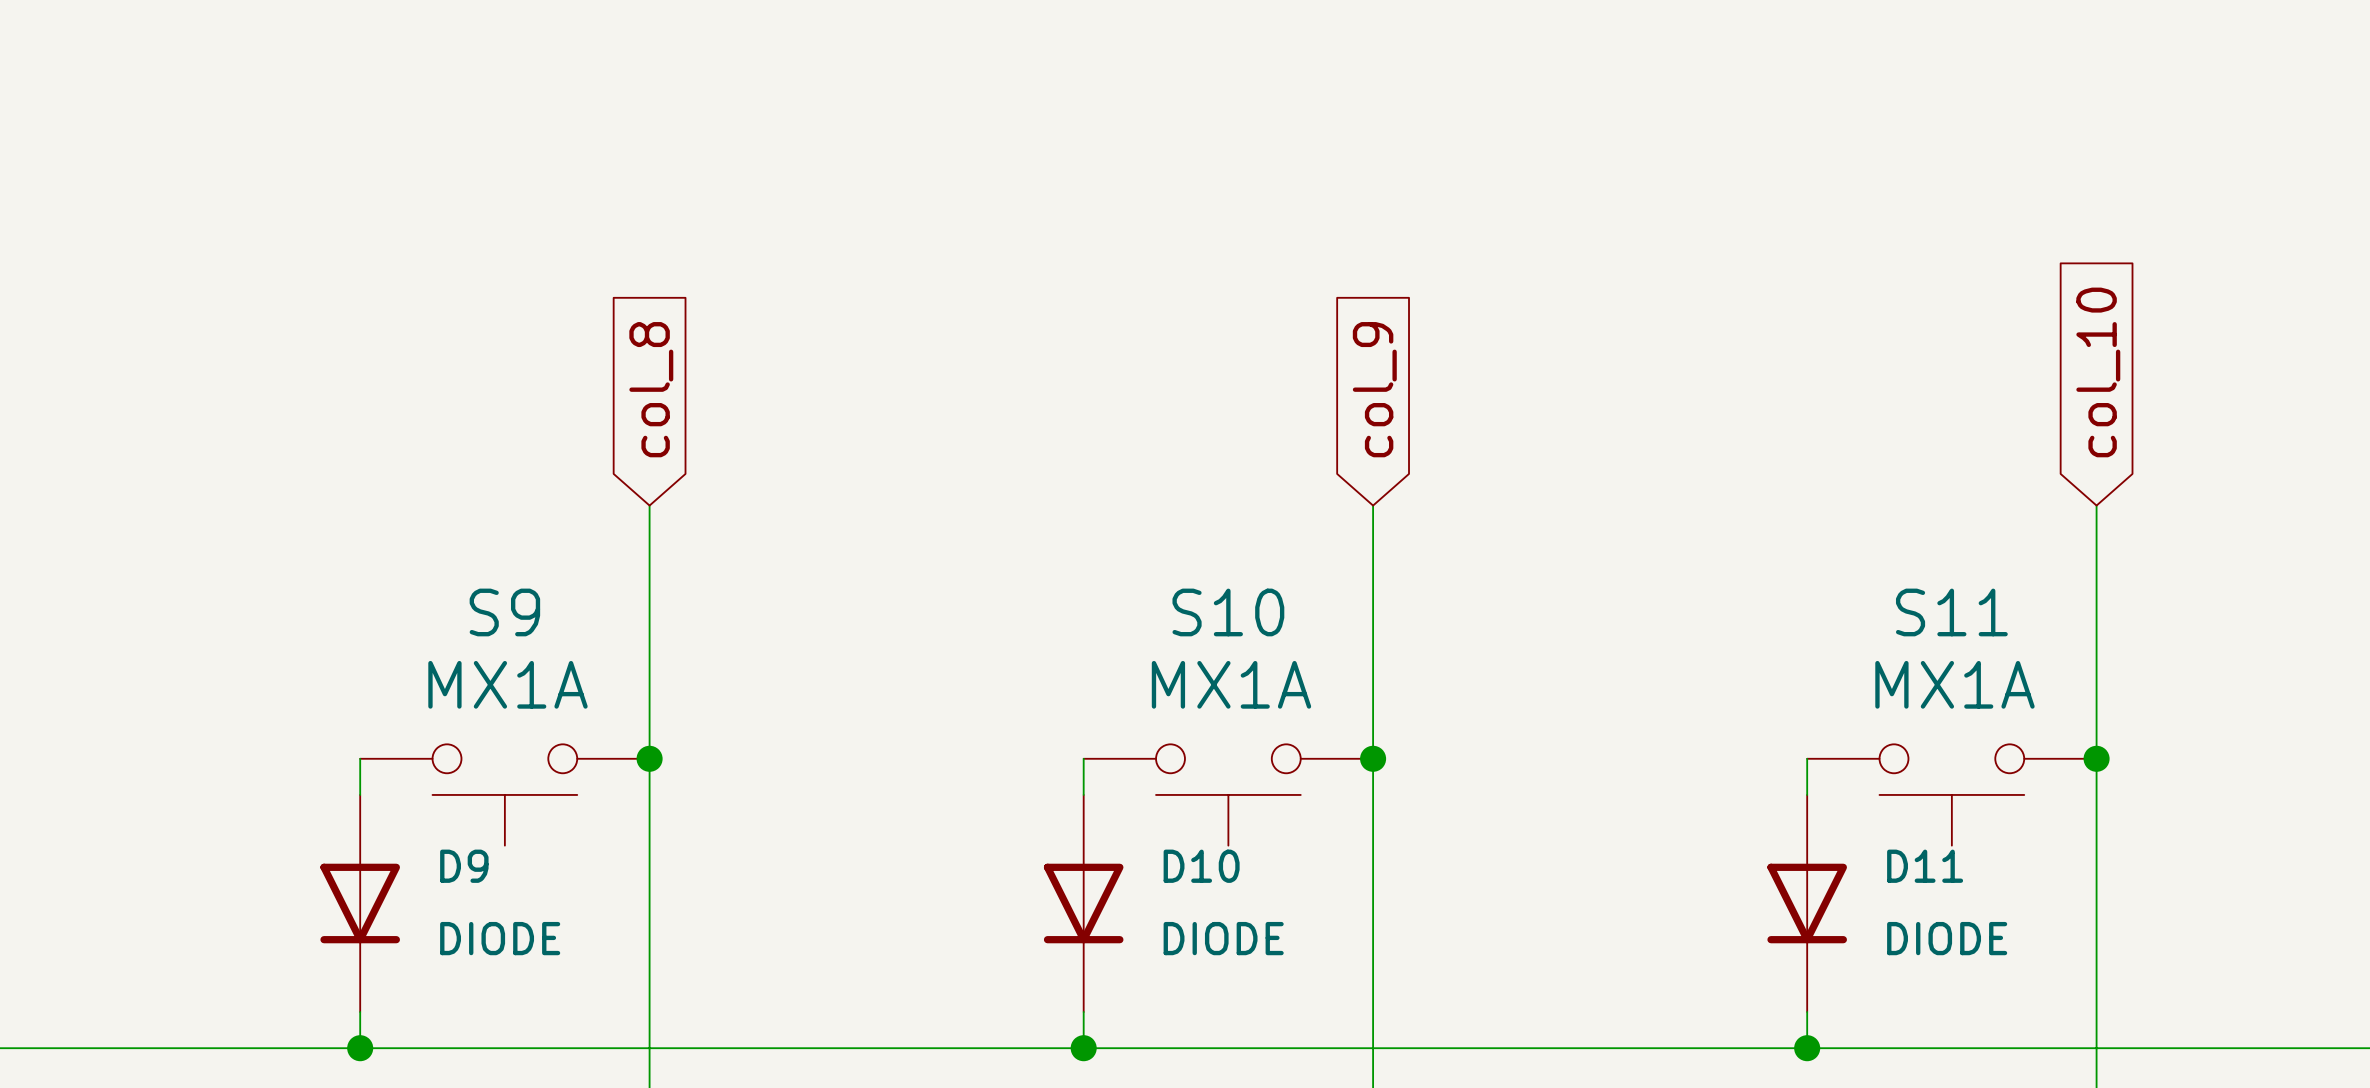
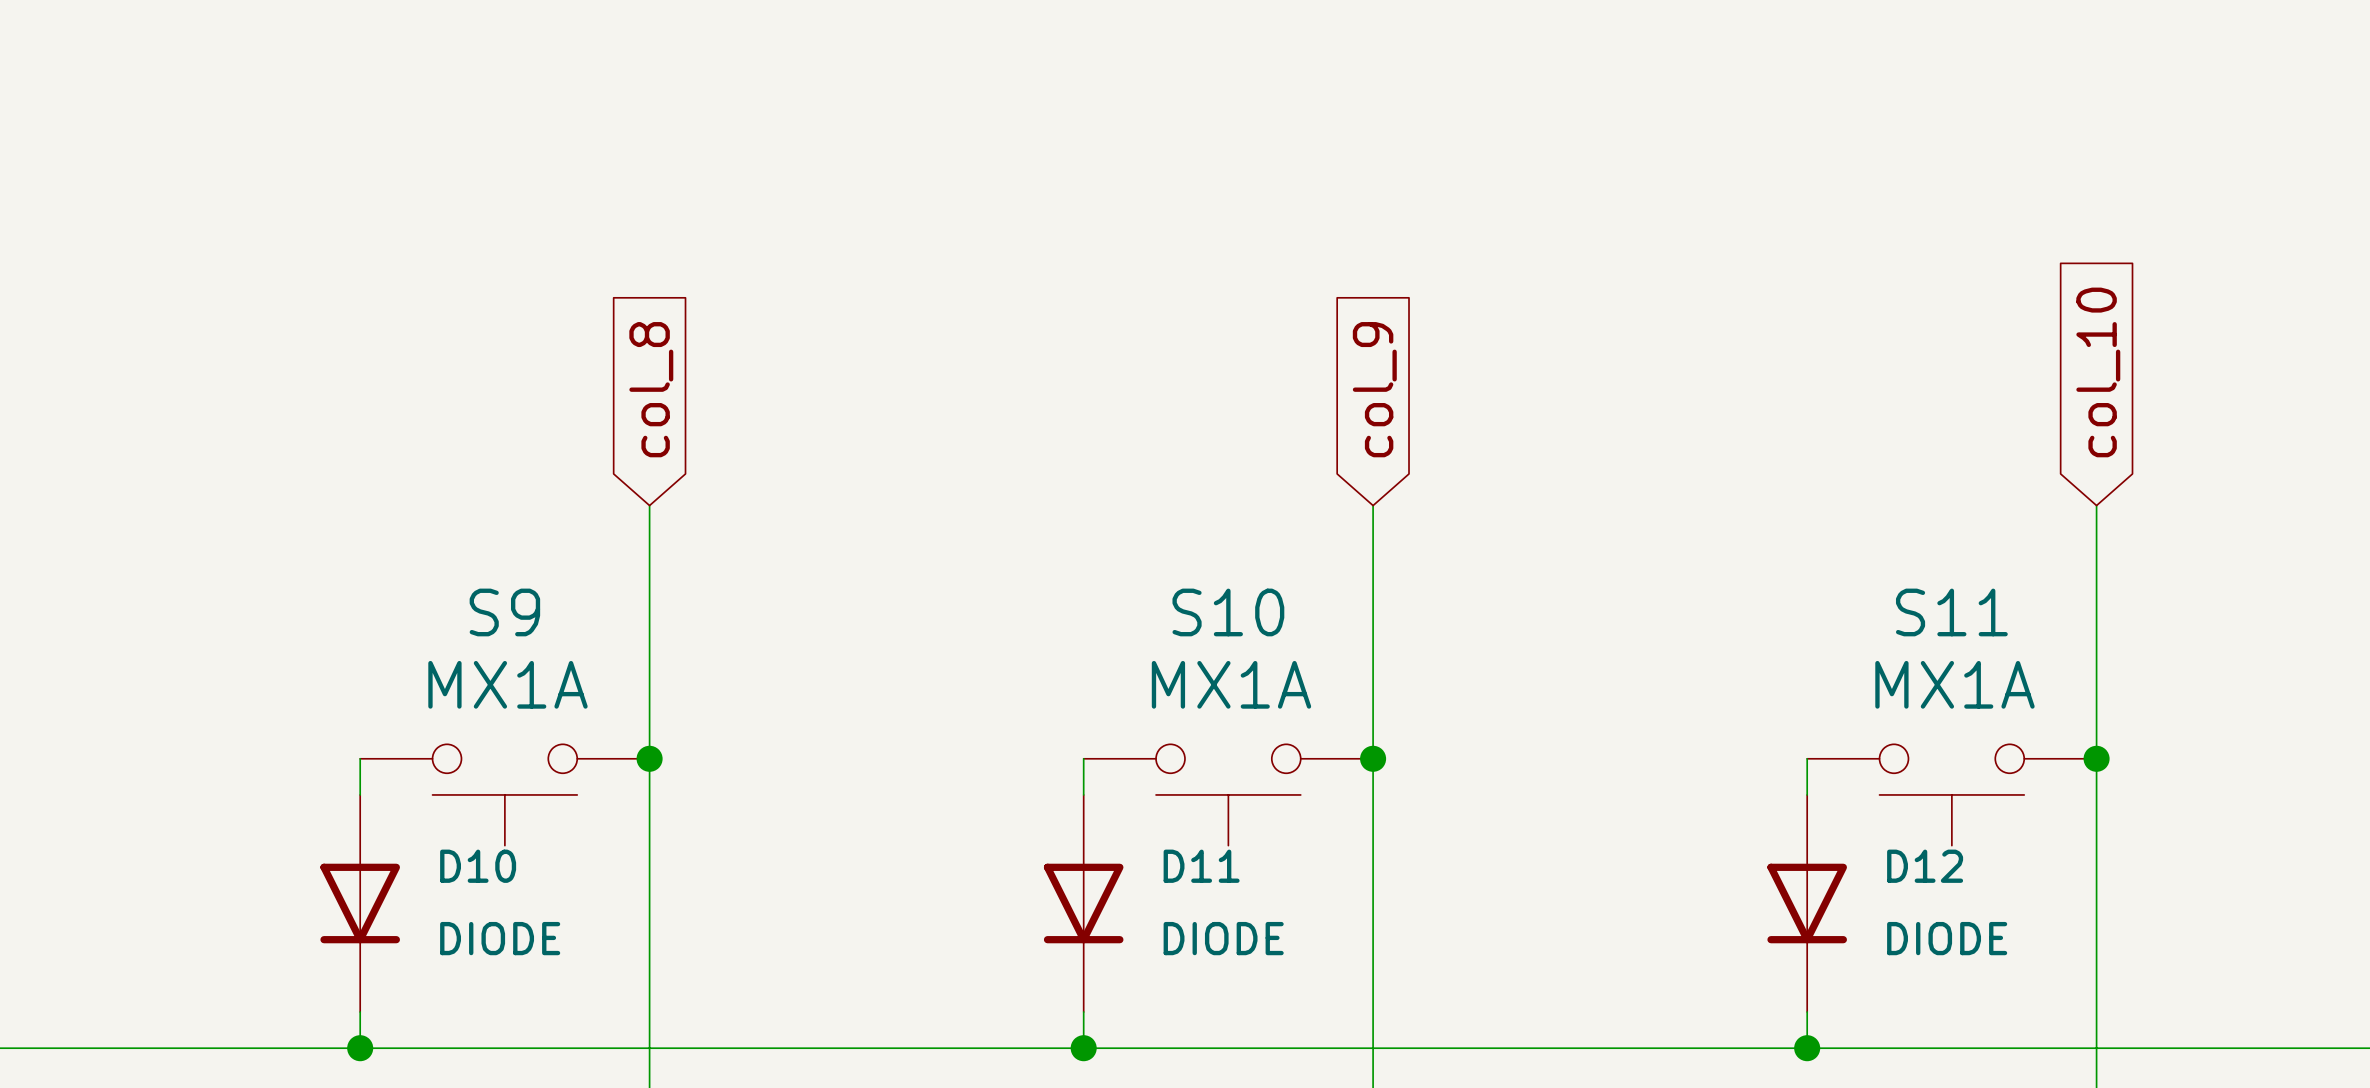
D9 name: D9 (464, 866) -> D10 (478, 866)
D10 name: D10 (1201, 866) -> D11 (1201, 866)
D11 name: D11 (1925, 866) -> D12 (1925, 866)

